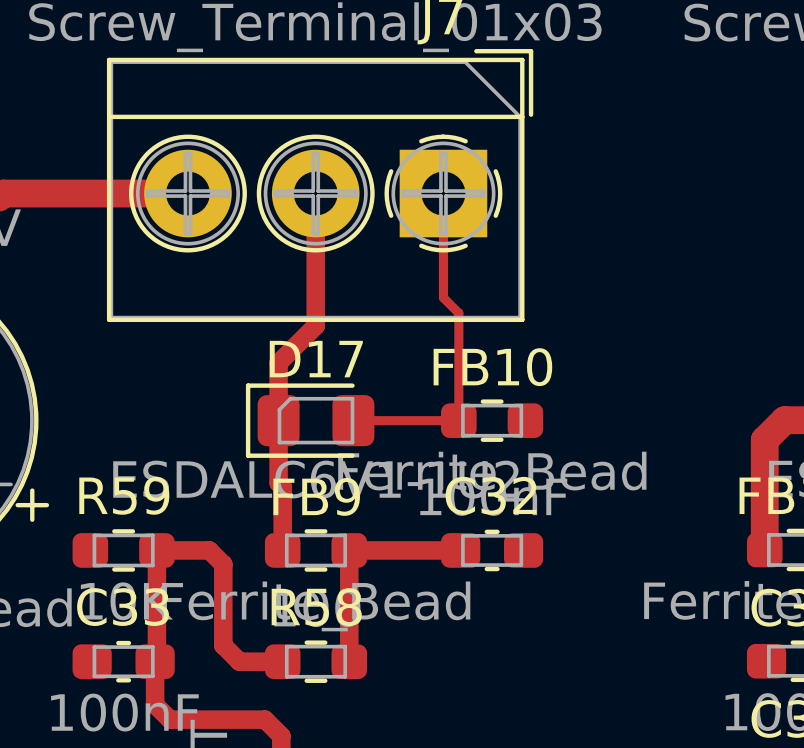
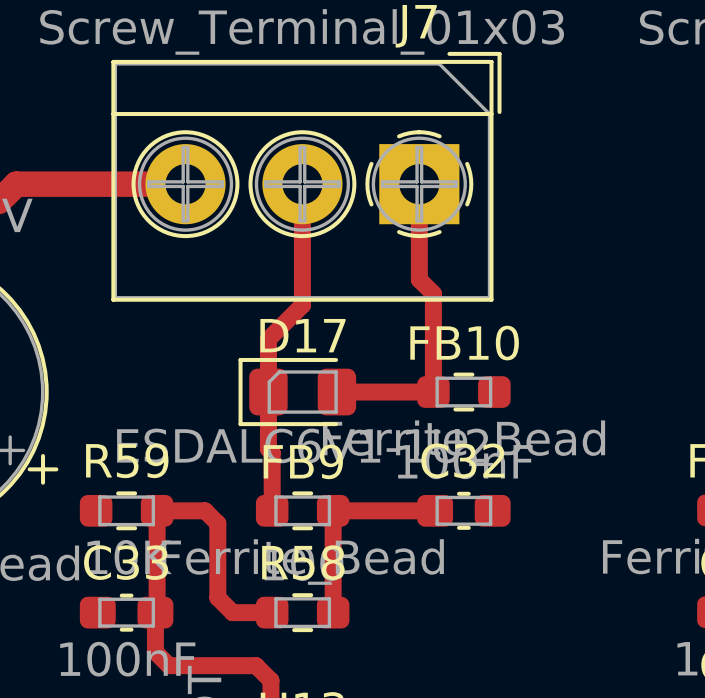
top track width: thin (443, 193) (443, 297) (458, 313) (458, 420) (353, 420) -> thick (419, 184) (419, 279) (433, 293) (433, 392) (336, 392)

